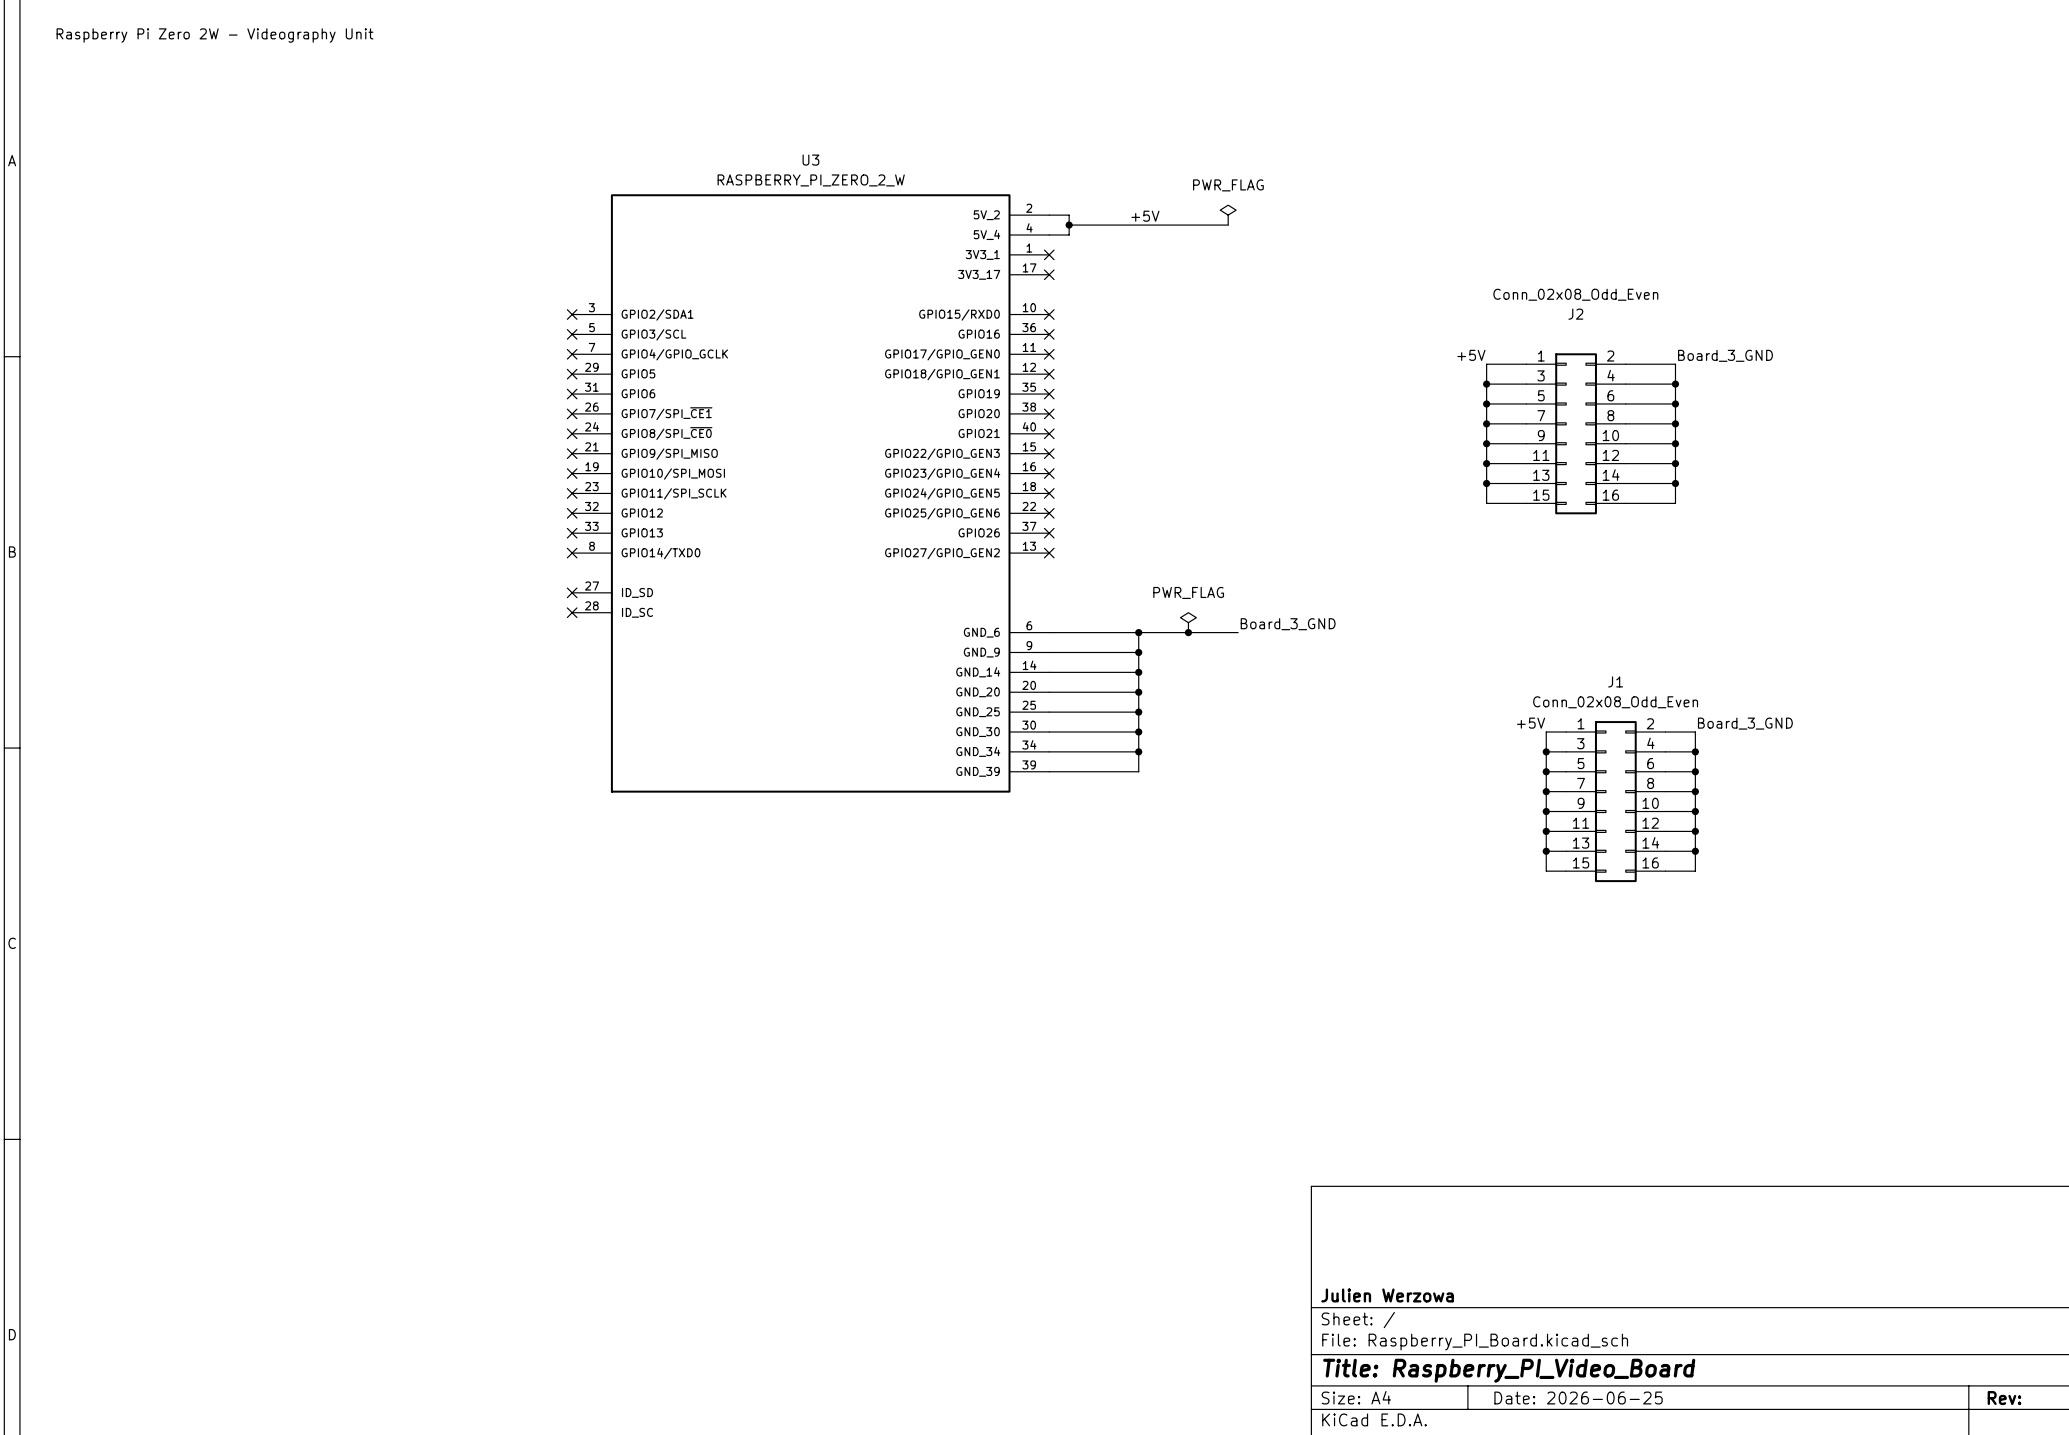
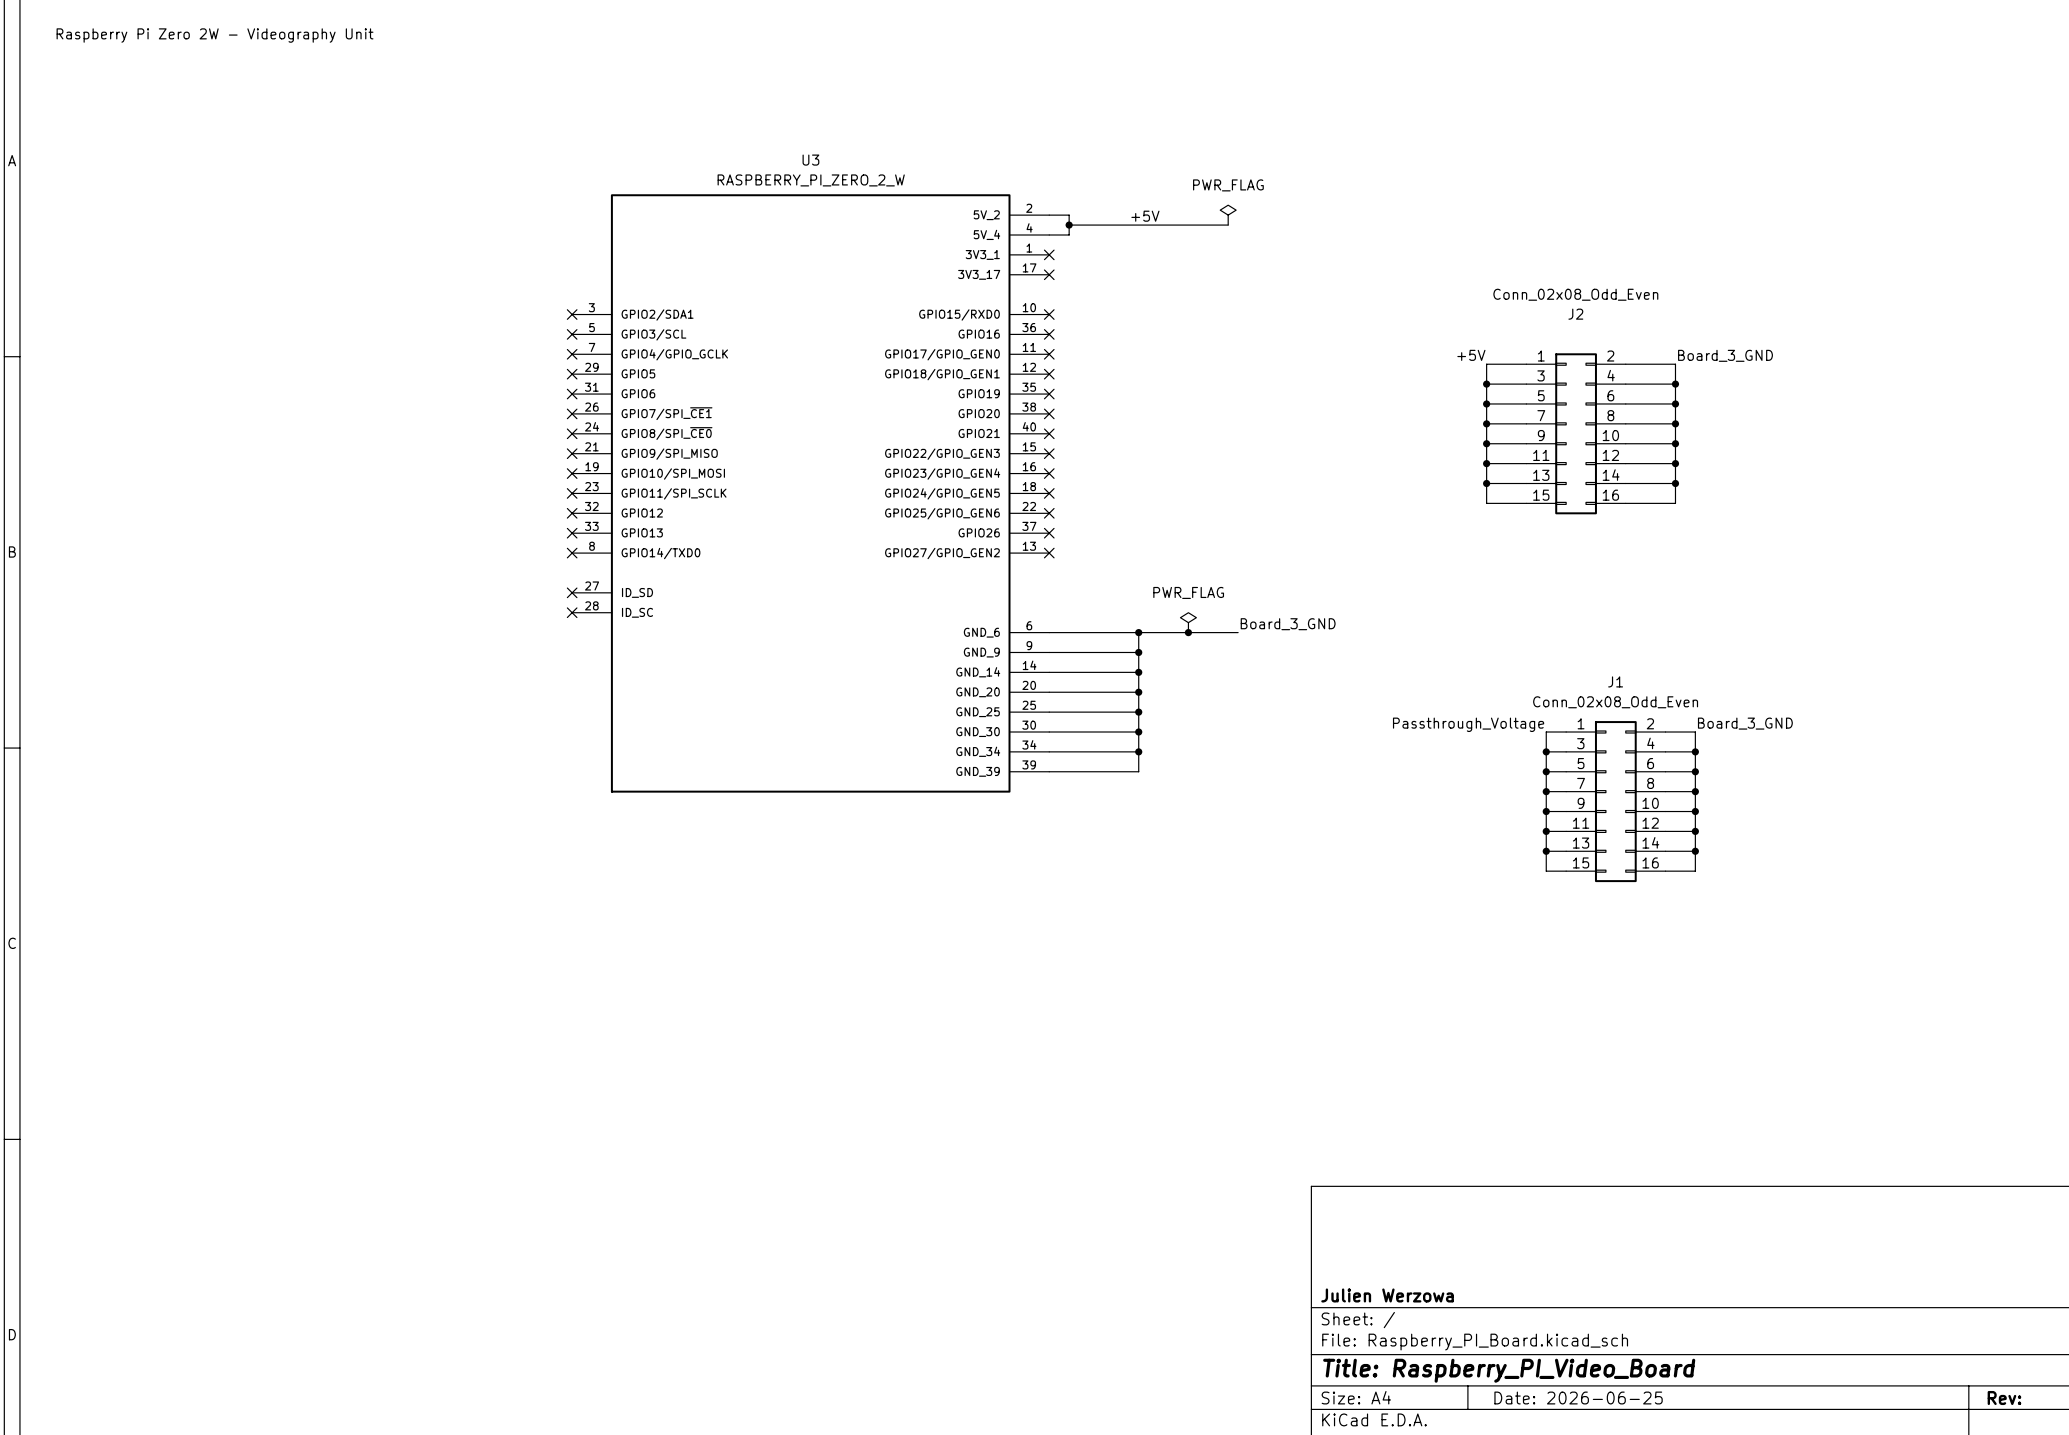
label: +5V (1531, 723) -> Passthrough_Voltage (1468, 724)

